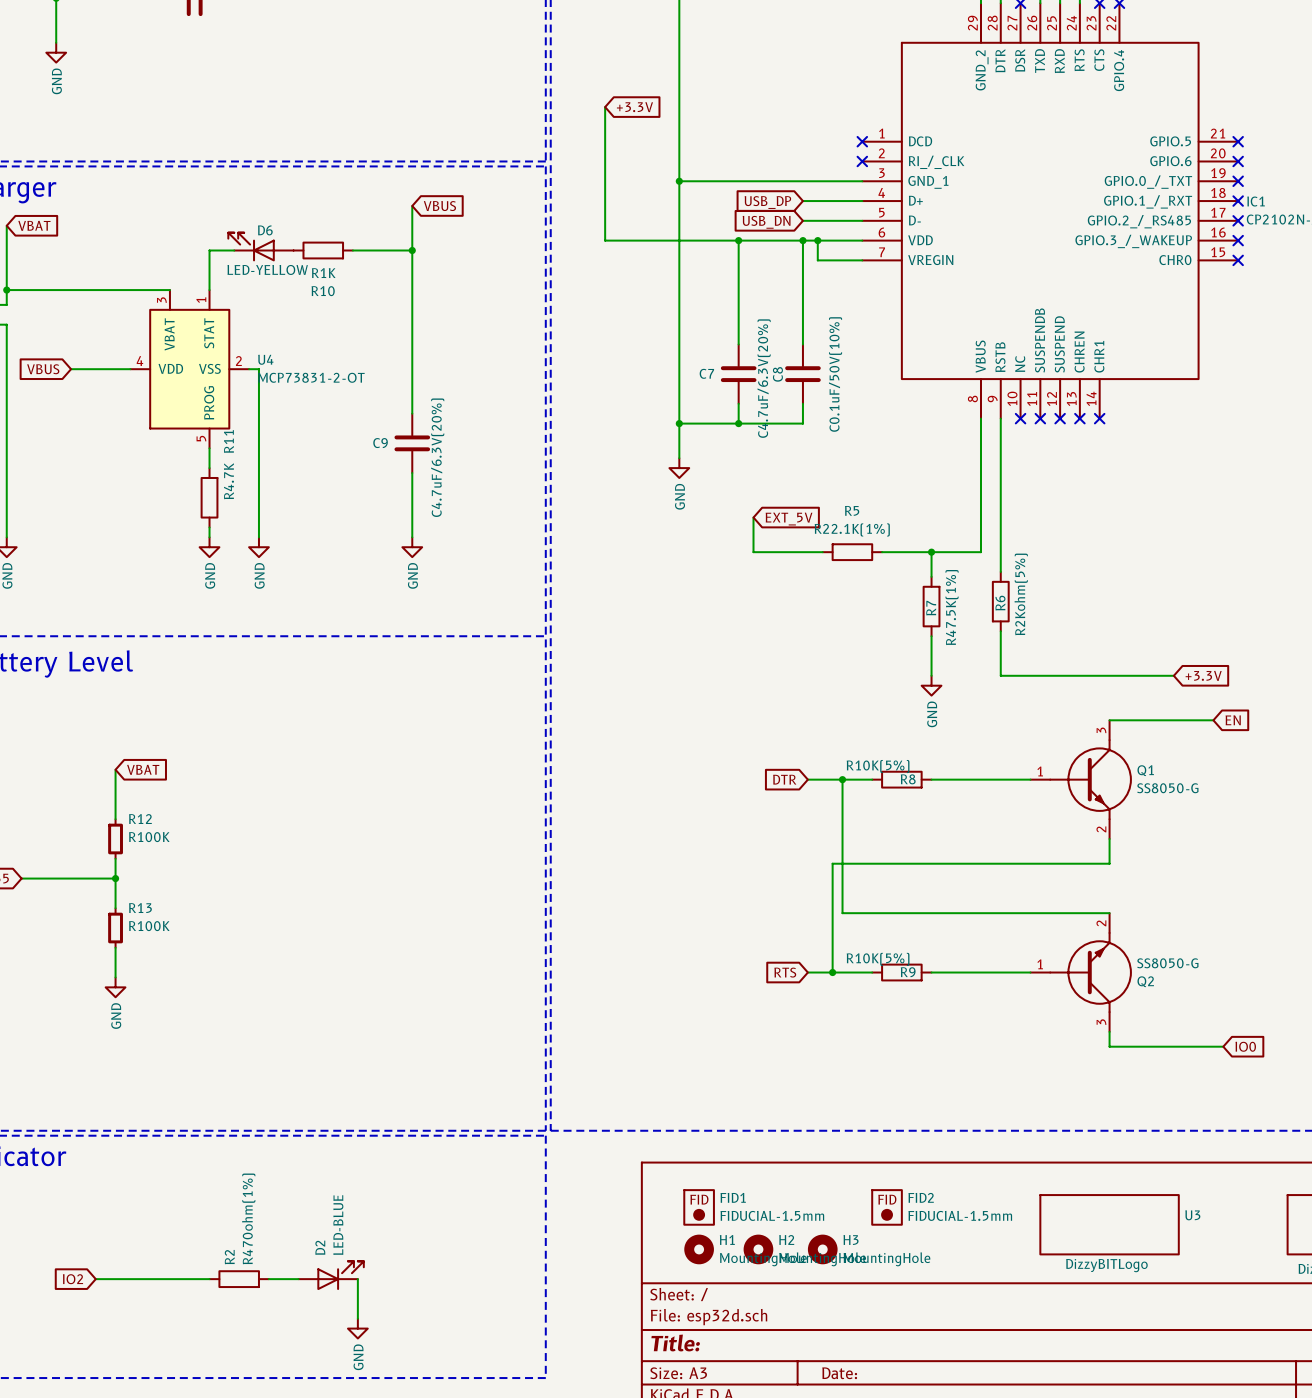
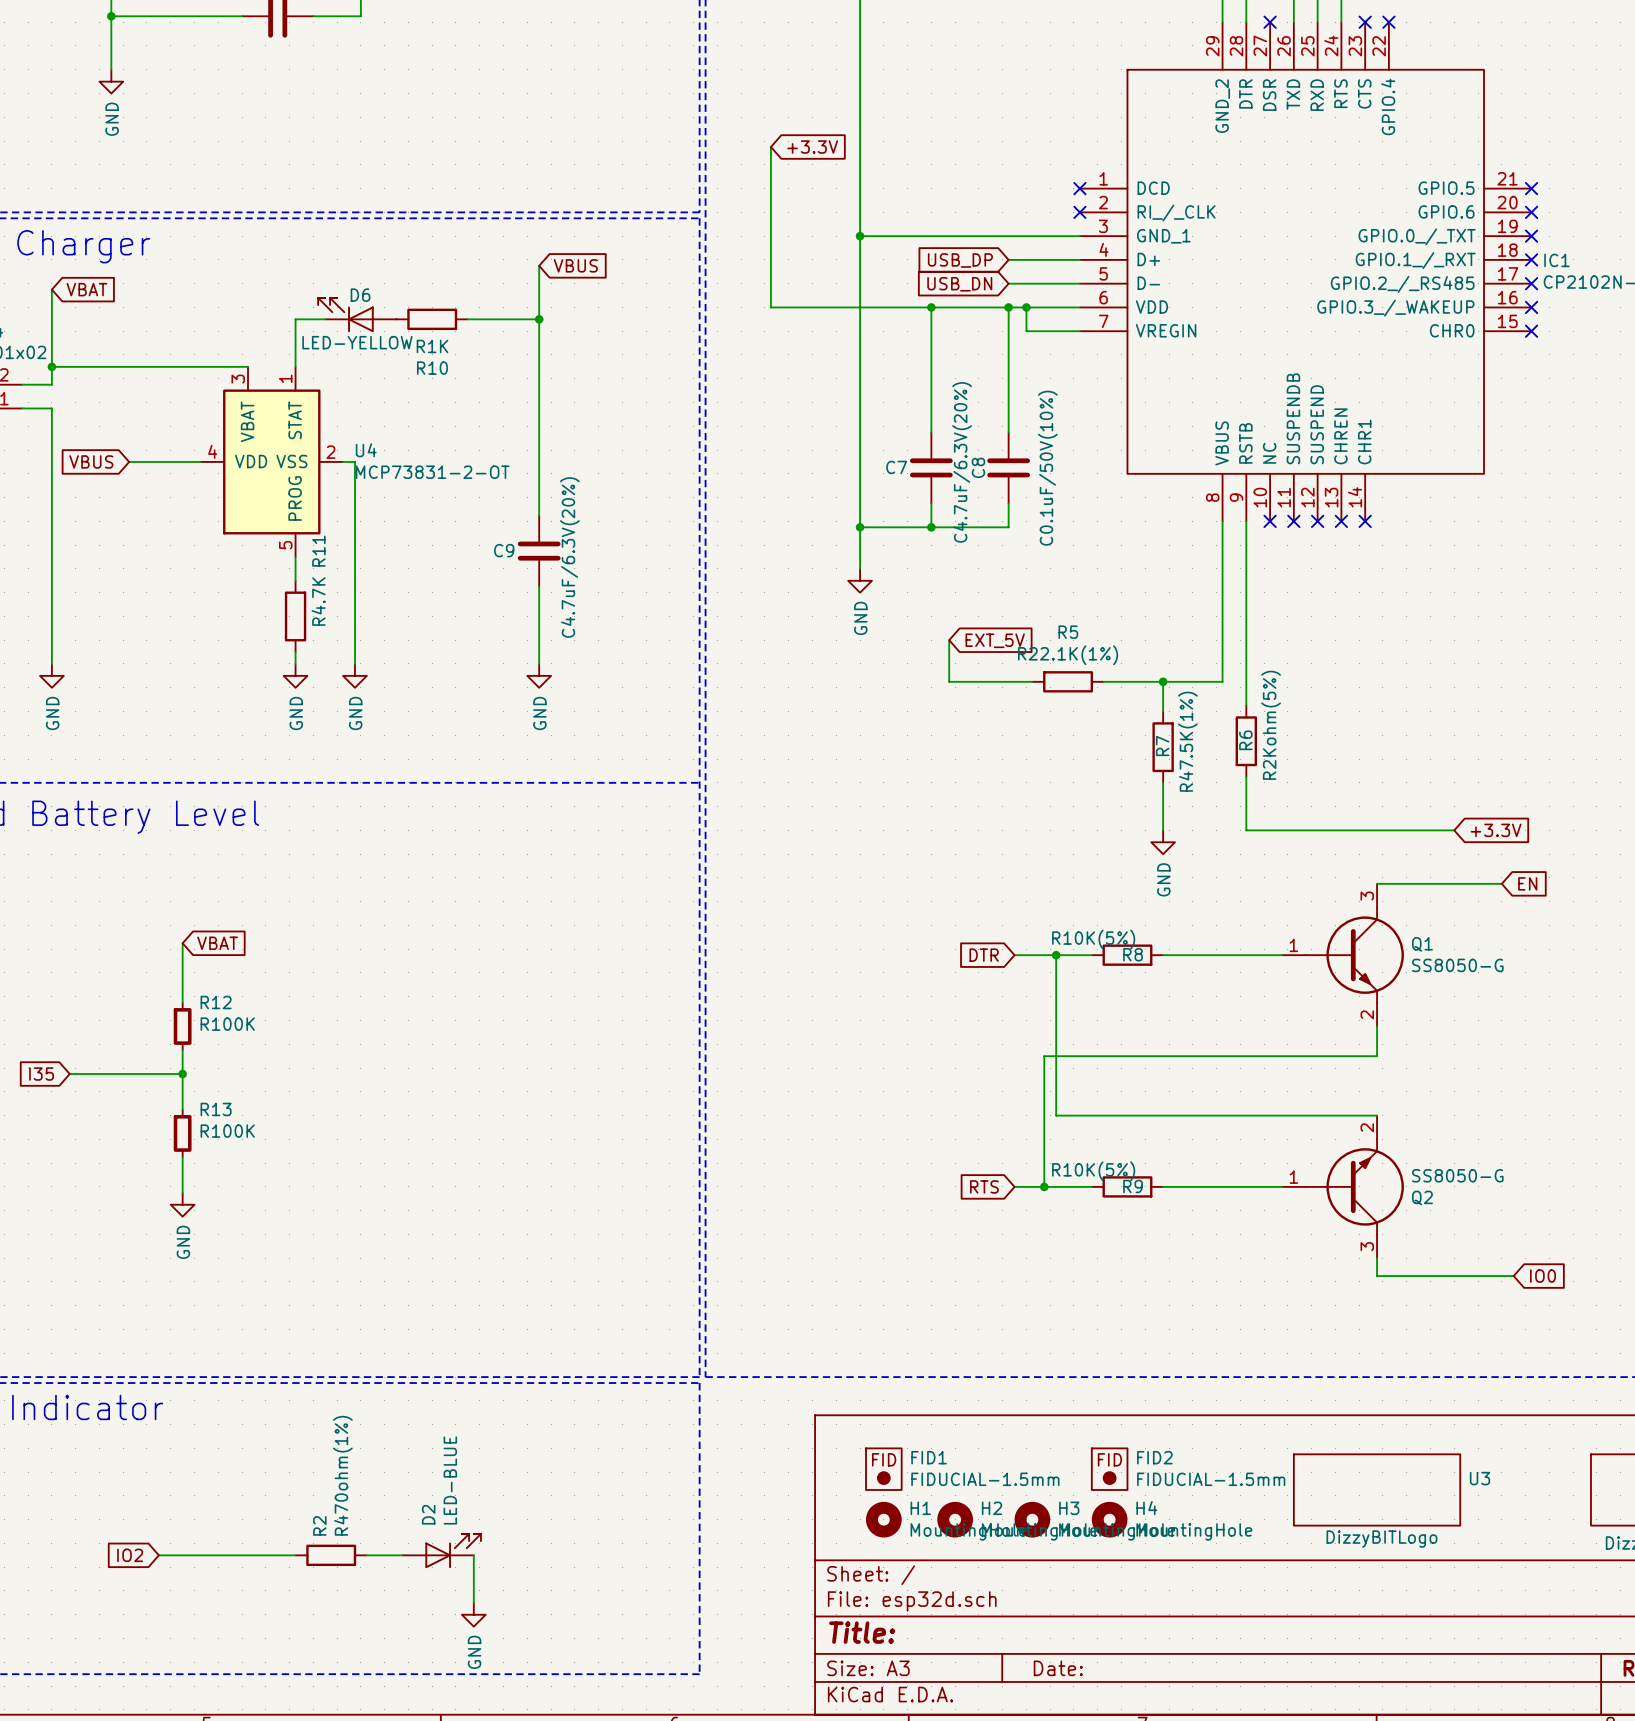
H4: none -> MountingHole (1109, 1519)

